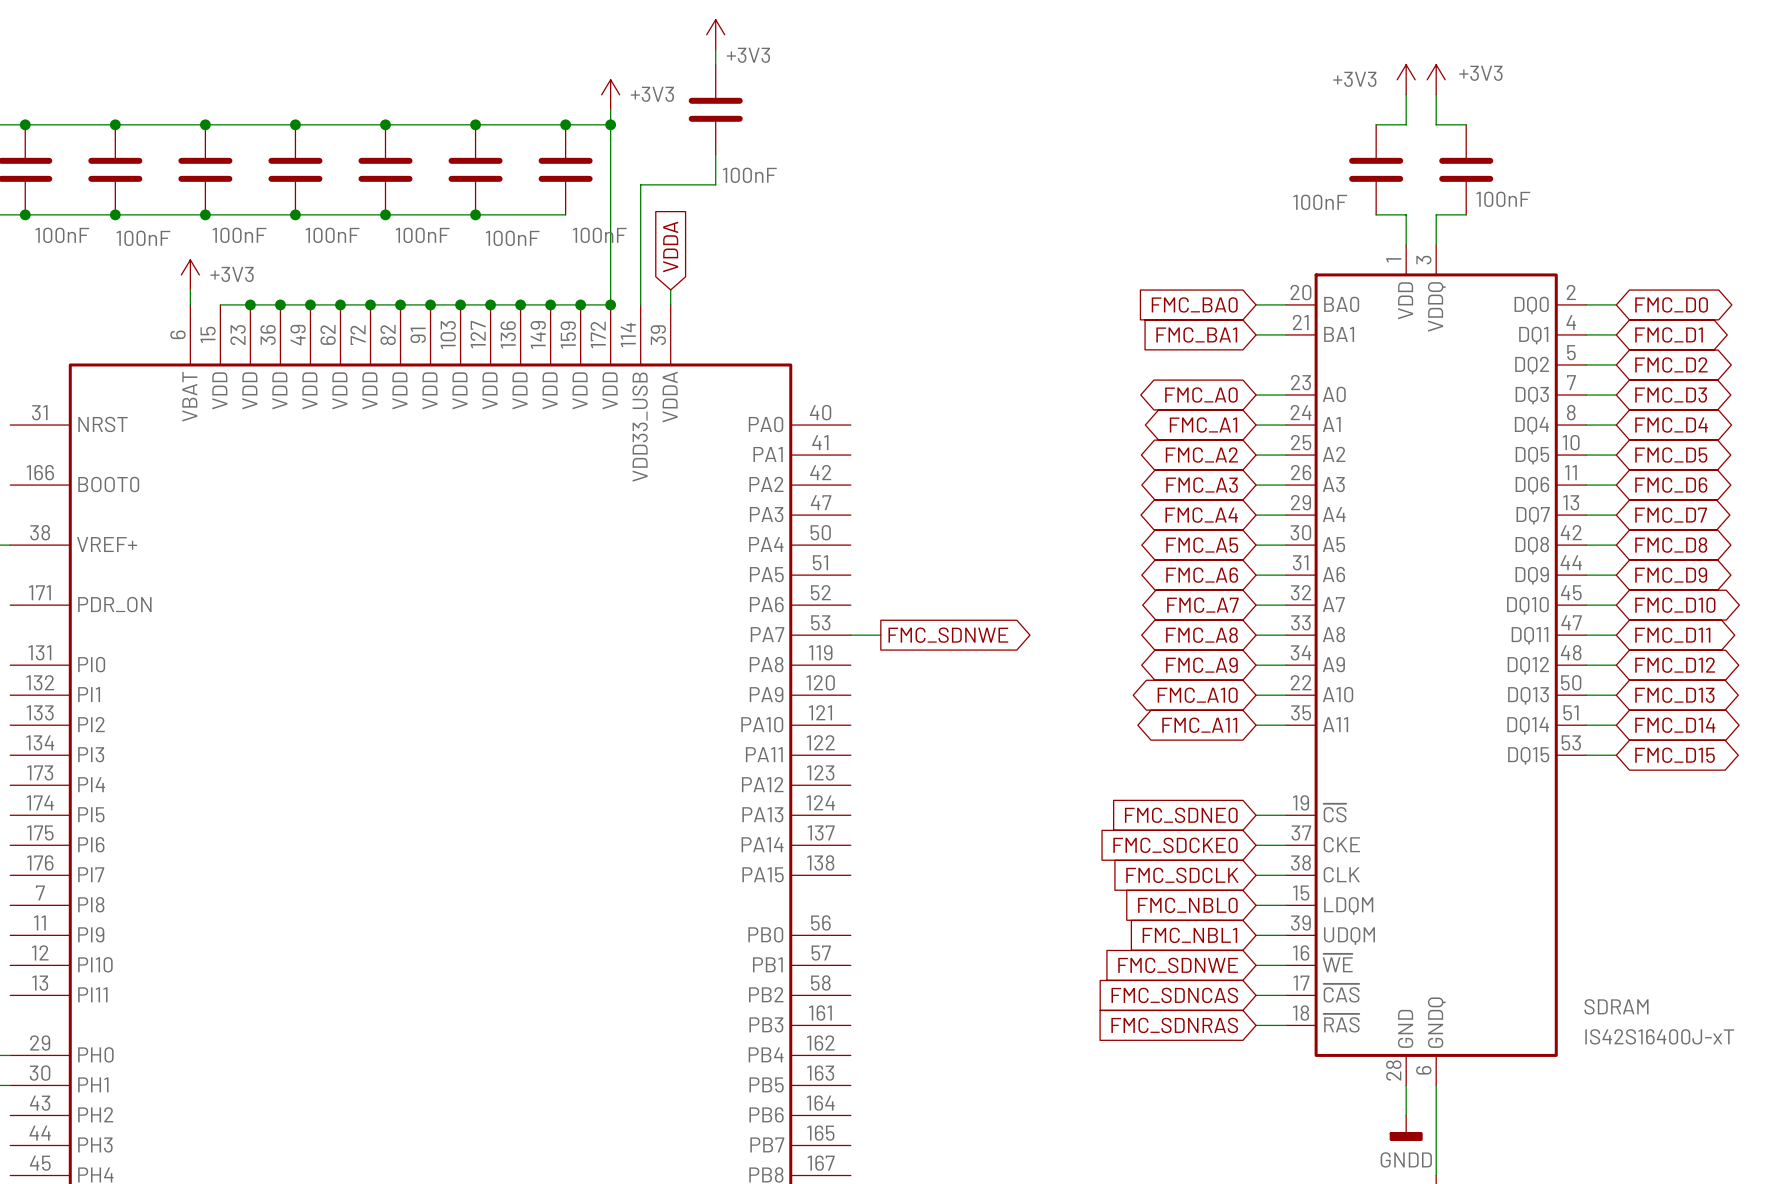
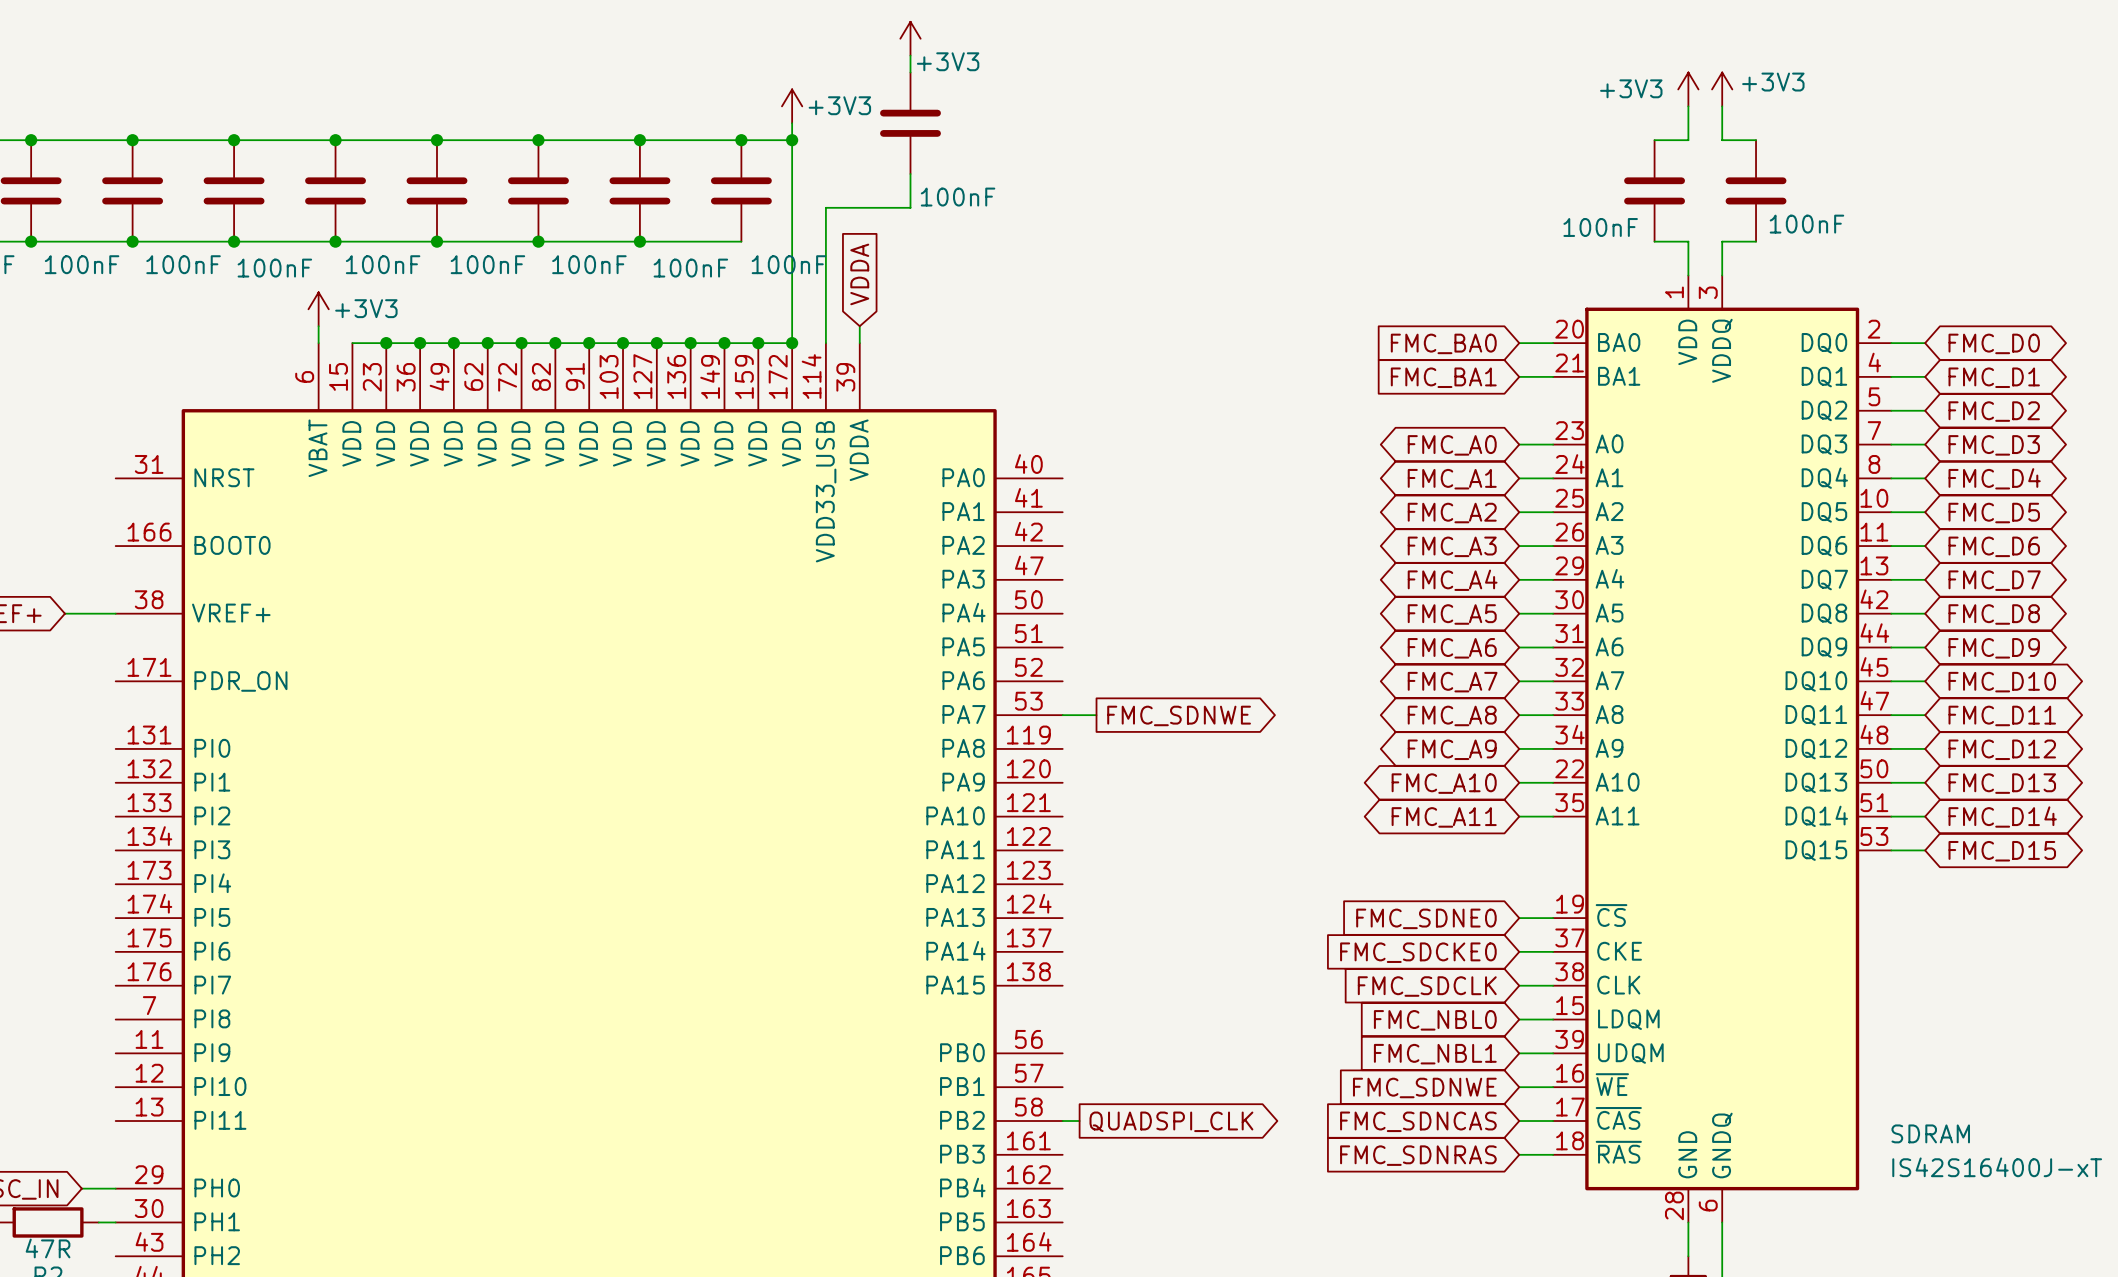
wire: none -> (1062, 1121) (1079, 1121)
global label: none -> QUADSPI_CLK (1171, 1121)

